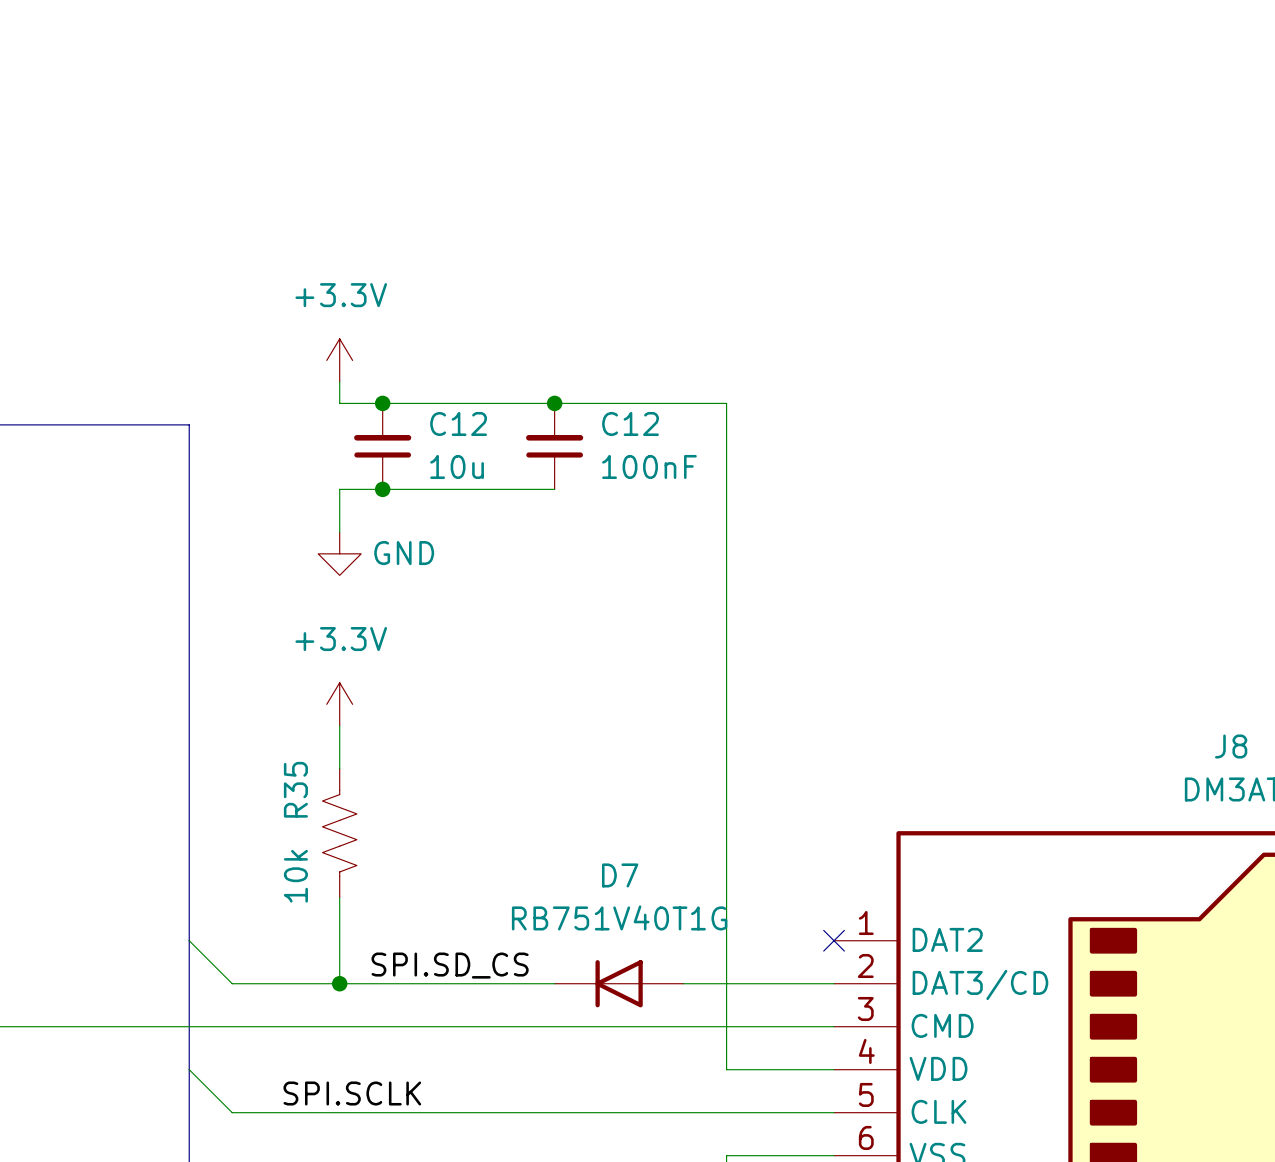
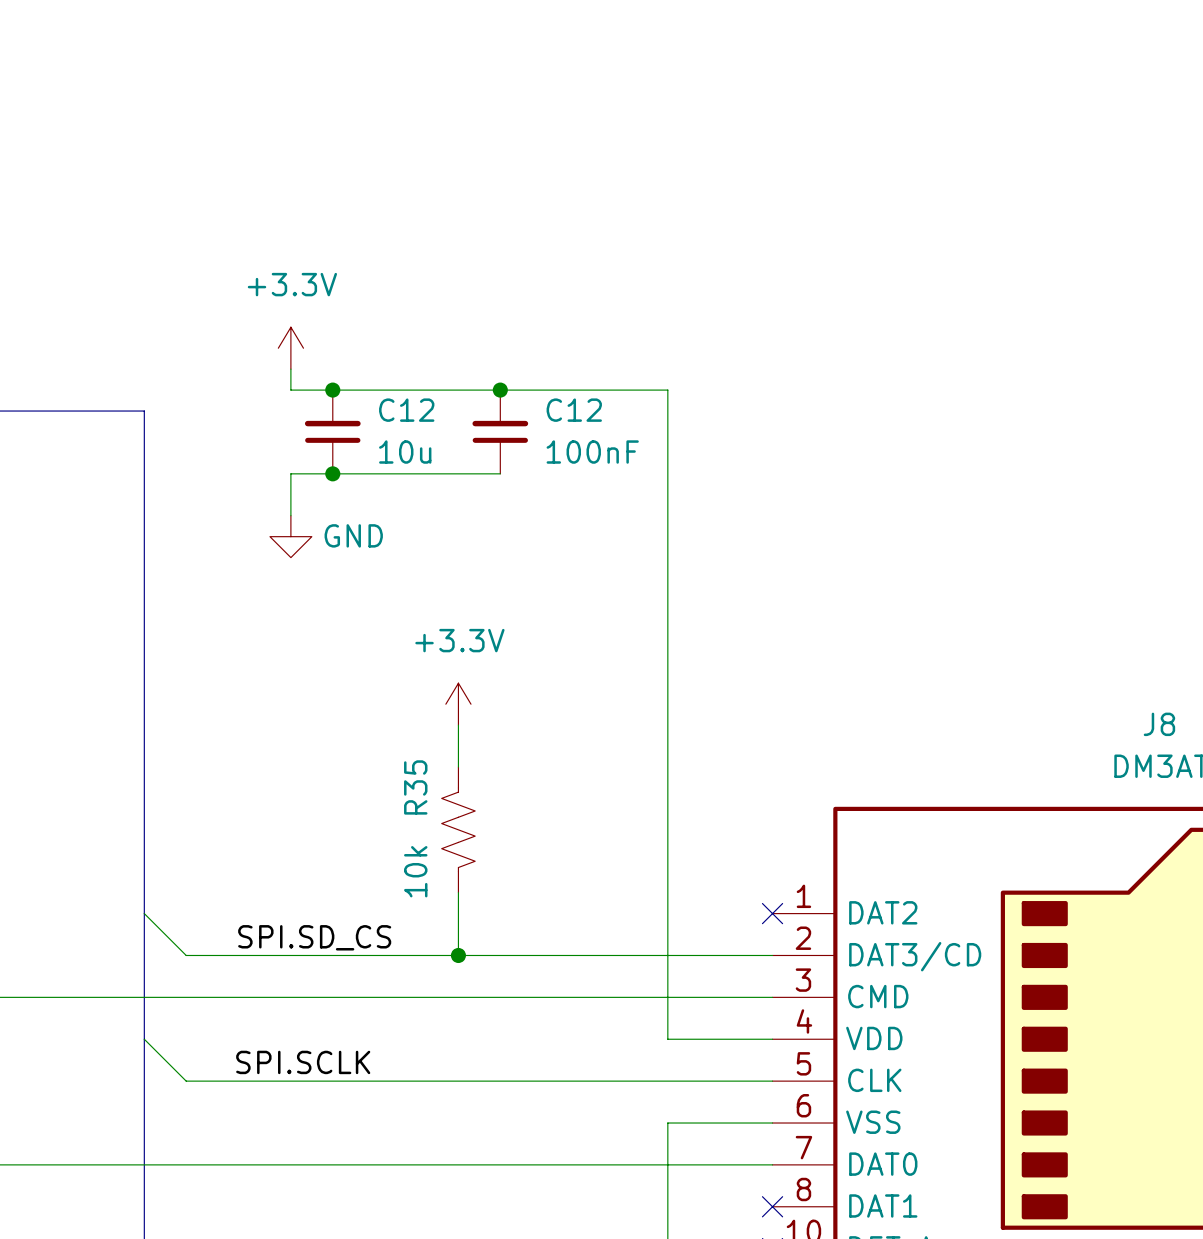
power symbol position: +3.3V (339, 704) -> +3.3V (458, 704)
wire: (339, 725) (339, 768) -> (458, 725) (458, 767)
R35 position: (339, 833) -> (458, 829)
wire: (339, 897) (339, 983) -> none
wire: none -> (458, 892) (458, 955)
label position: SPI.SD_CS (450, 965) -> SPI.SD_CS (314, 937)
junction: (339, 983) -> none
junction: none -> (458, 955)
D7: RB751V40T1G (619, 983) -> none

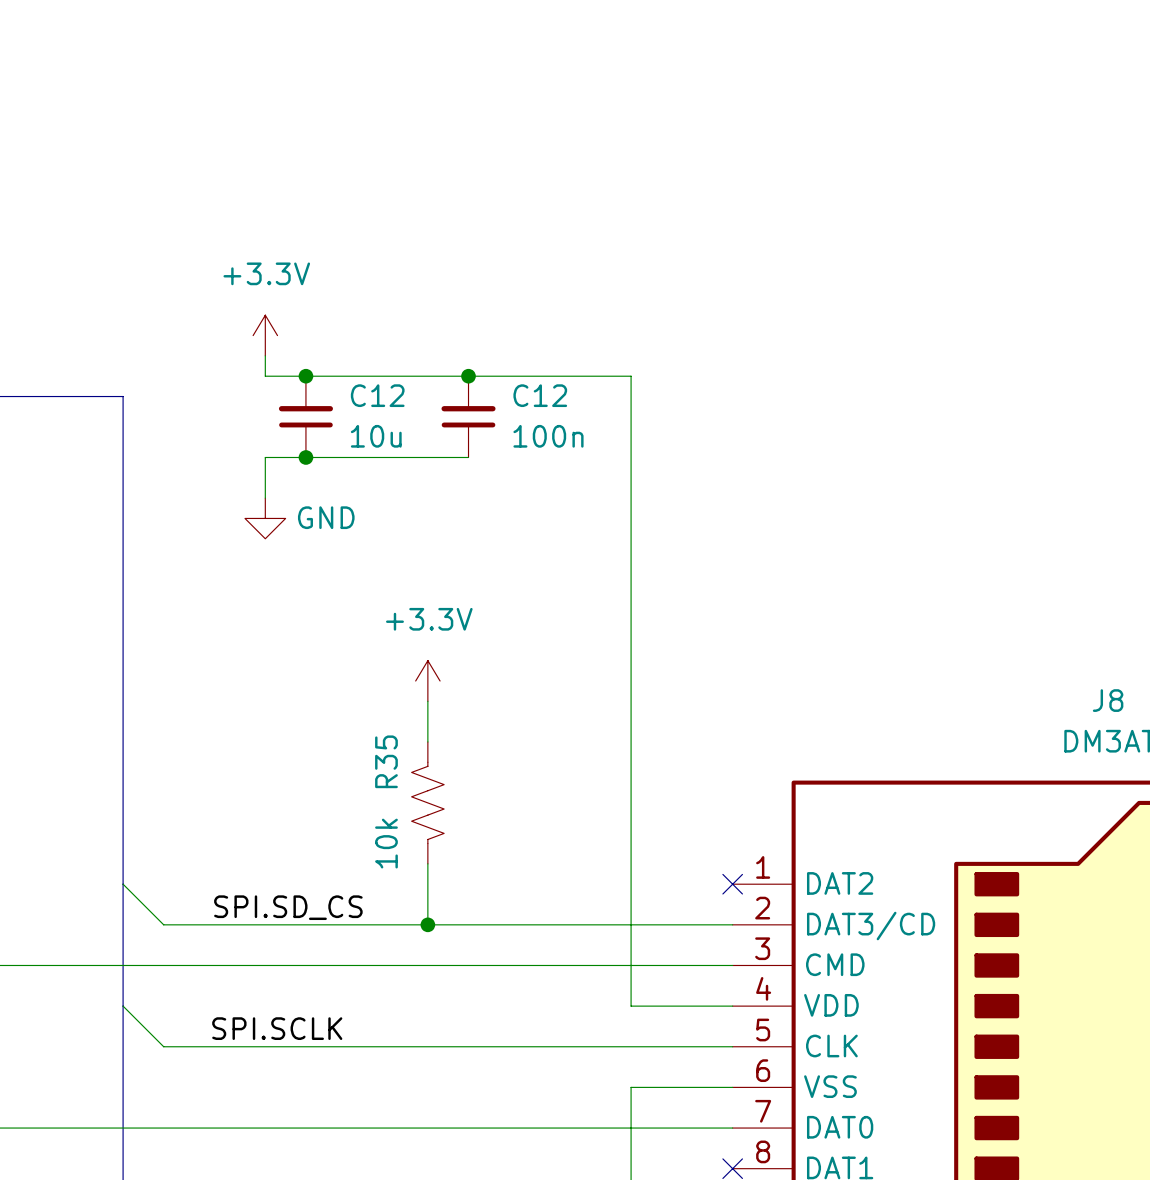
C12 value: 100nF (592, 452) -> 100n (548, 436)

